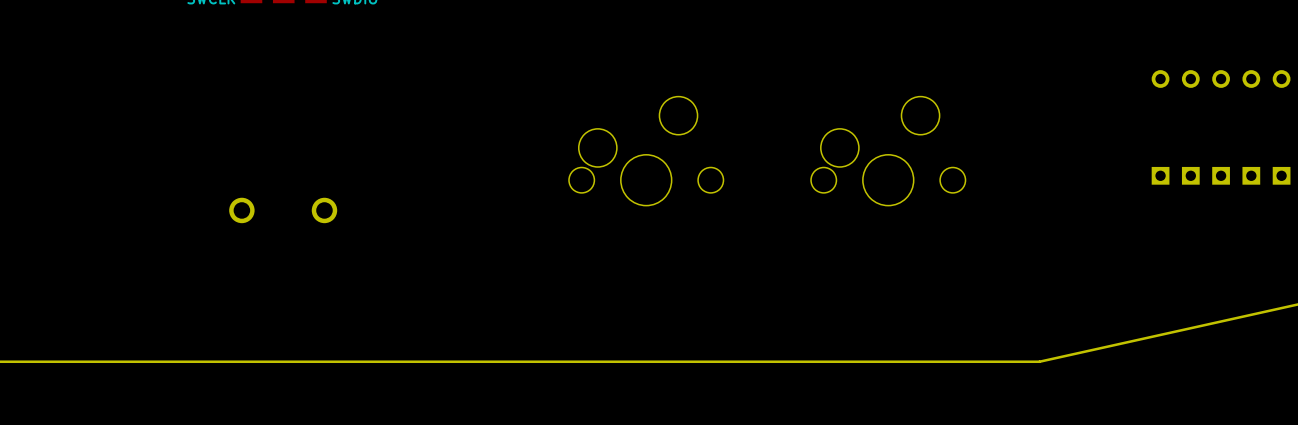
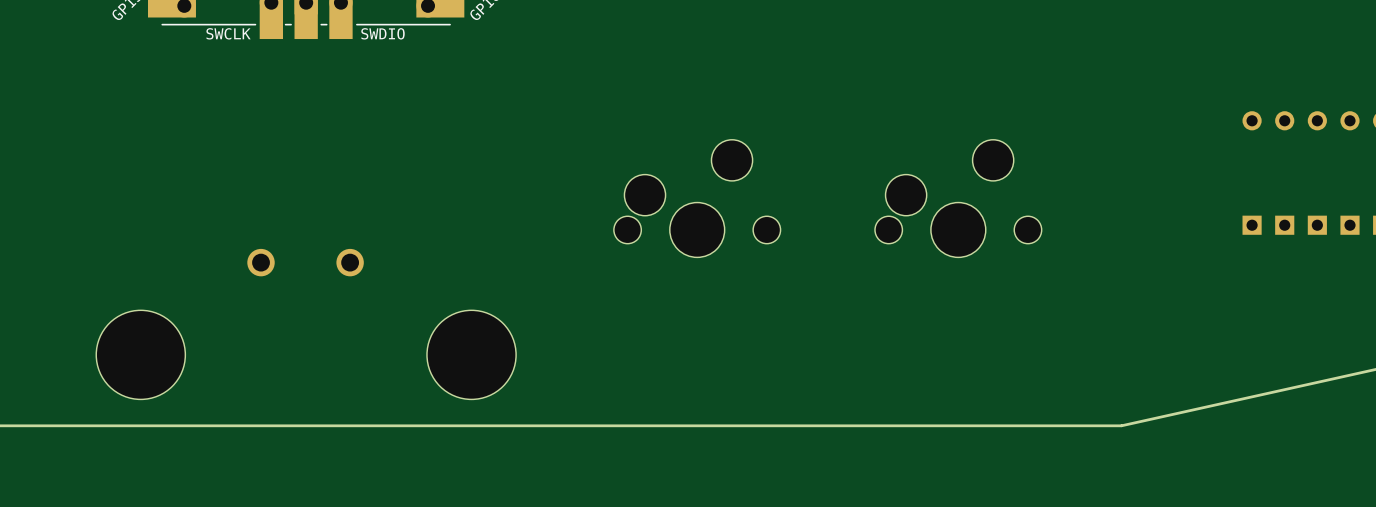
part: none -> (140, 354)
part: none -> (471, 354)

